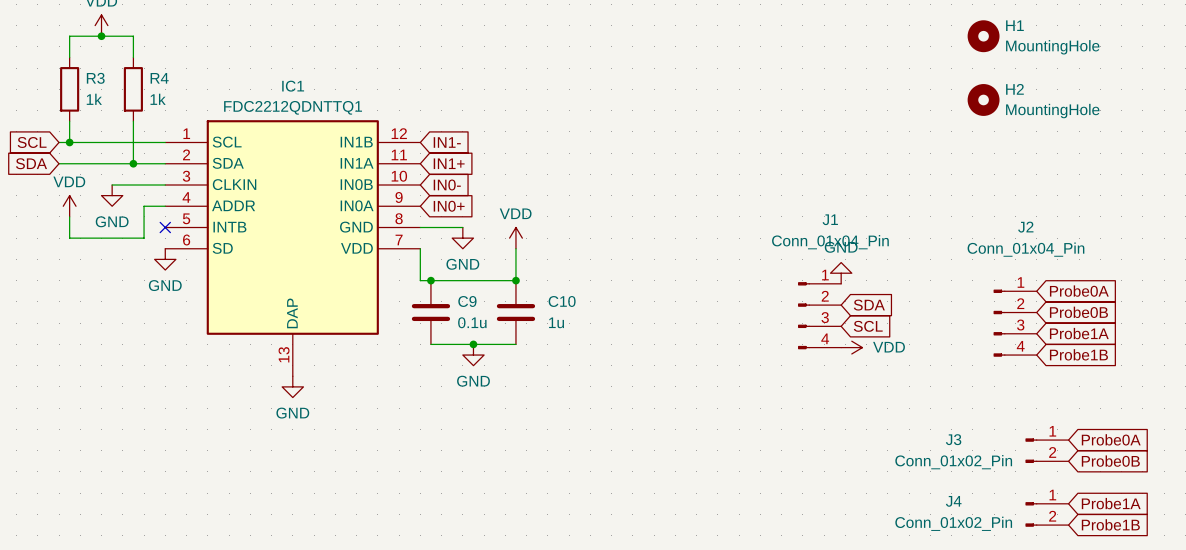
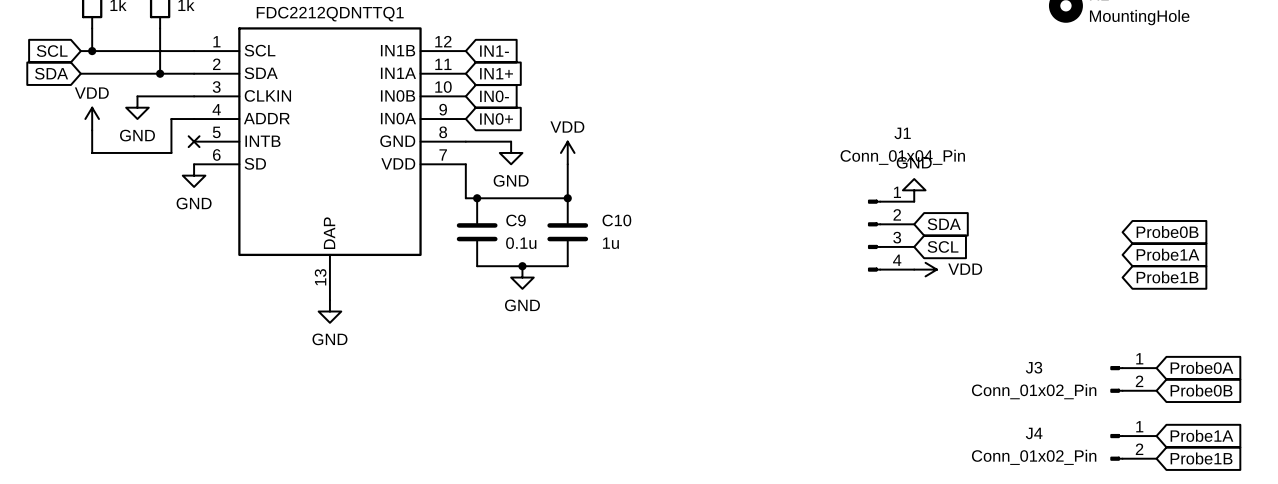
global label: Probe0A (1079, 291) -> none
J2: Conn_01x04_Pin (1015, 323) -> none

